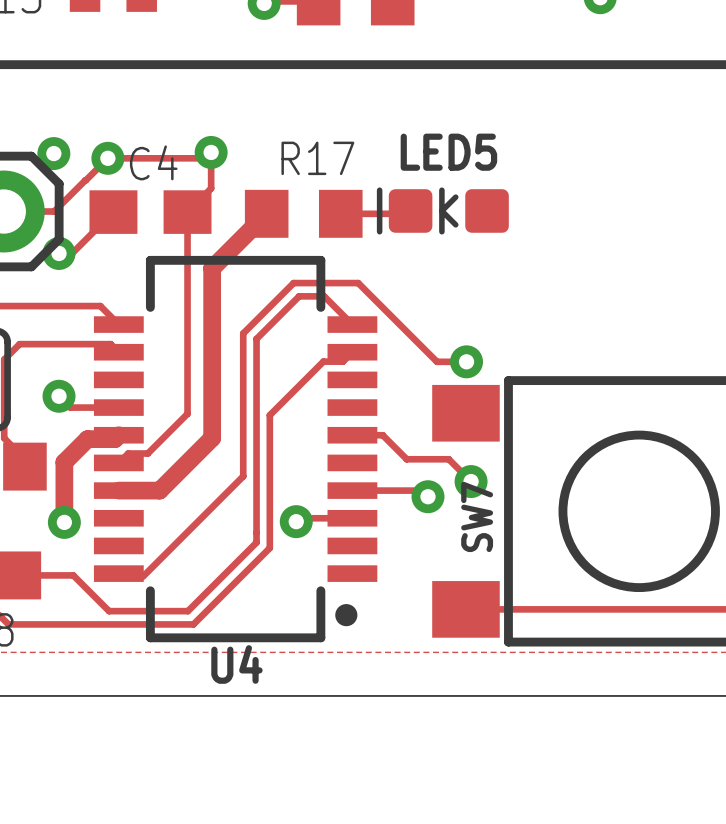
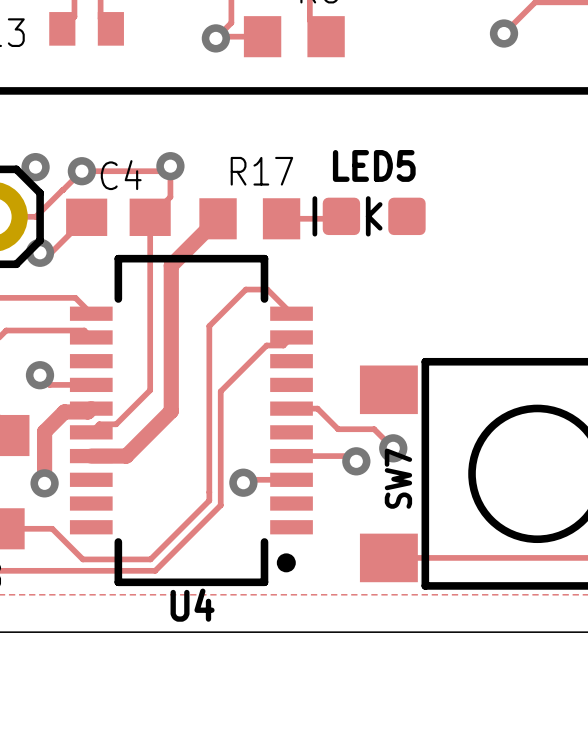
track: (466, 361) (436, 361) (358, 283) (293, 283) (243, 333) (243, 476) (142, 576) -> none
via: (466, 361) -> none

